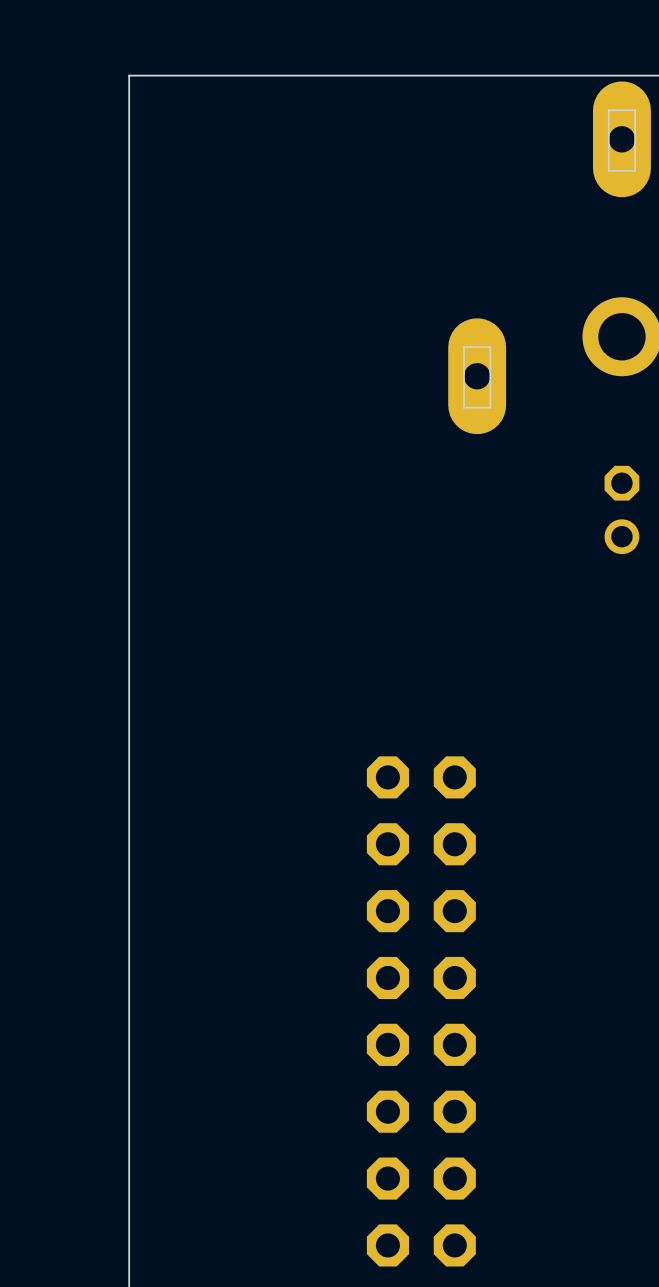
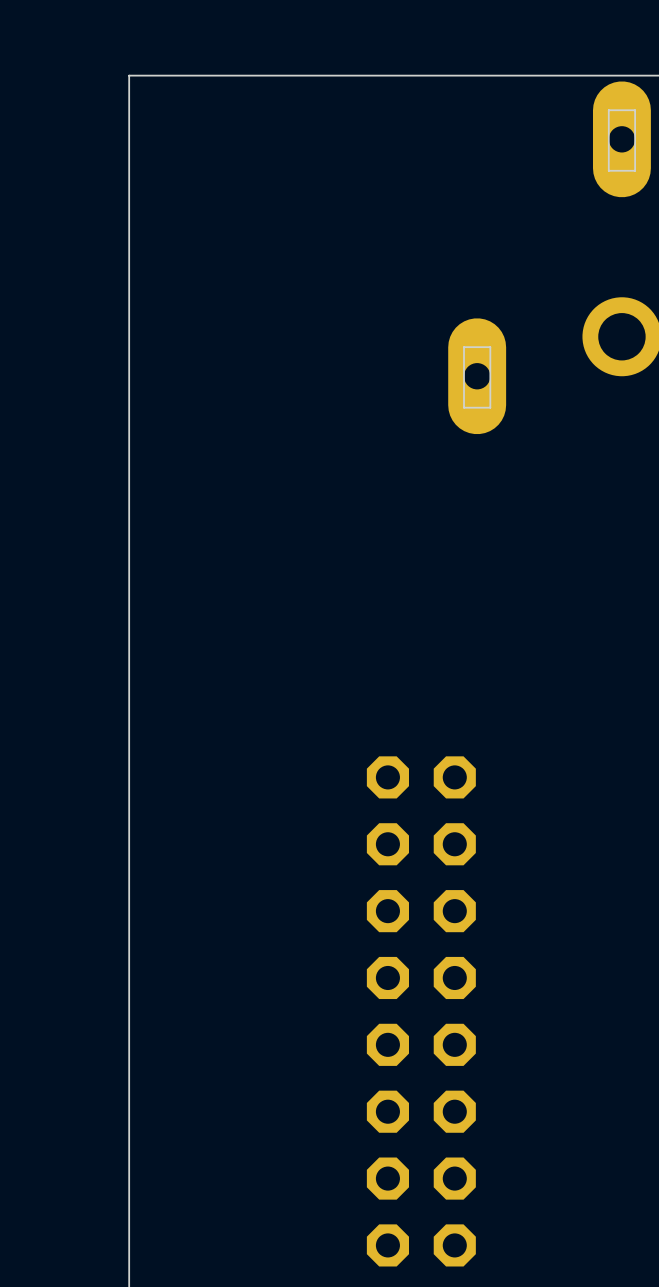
part: (621, 509) -> none

